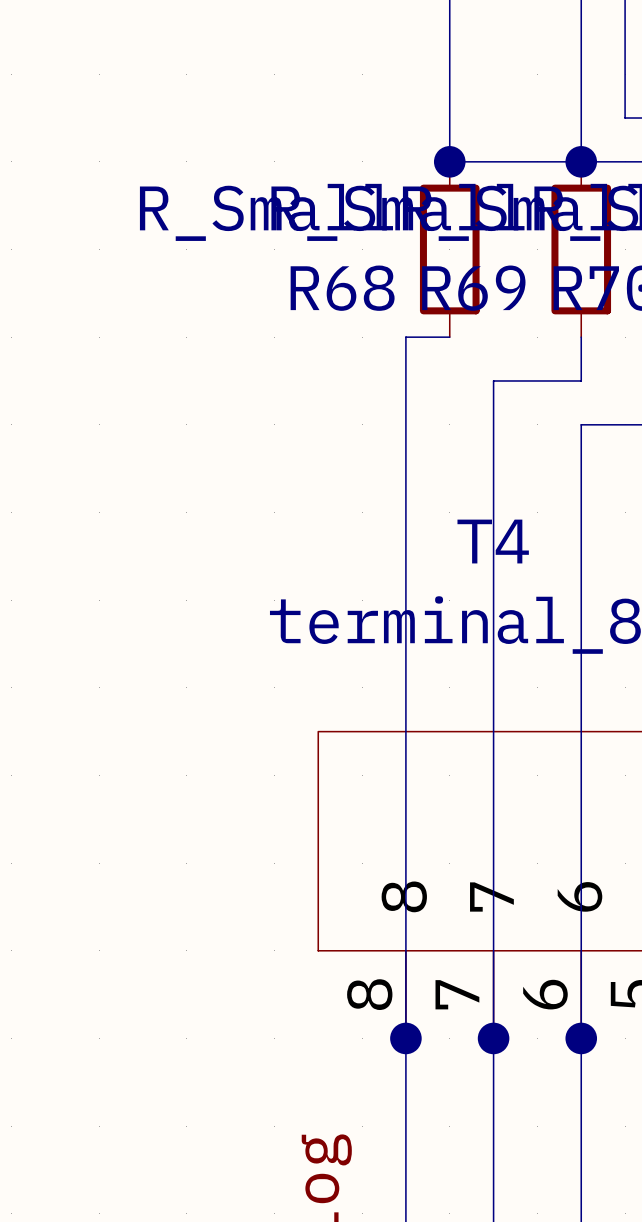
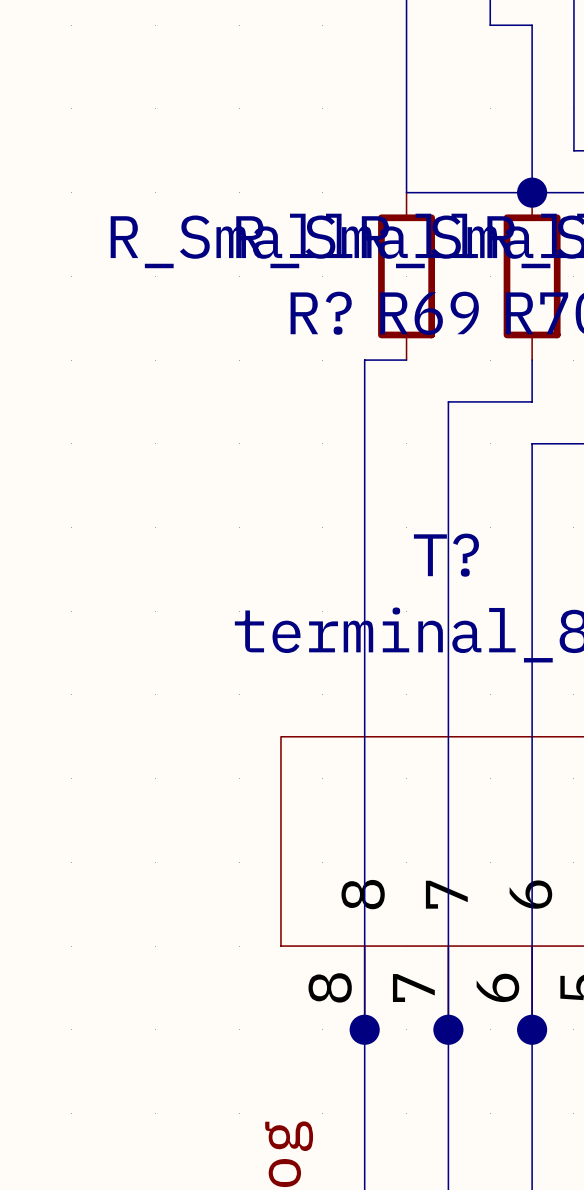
junction: (449, 161) -> none
R68 name: R68 (342, 288) -> R? (321, 313)
T4 name: T4 (493, 541) -> T? (446, 555)

